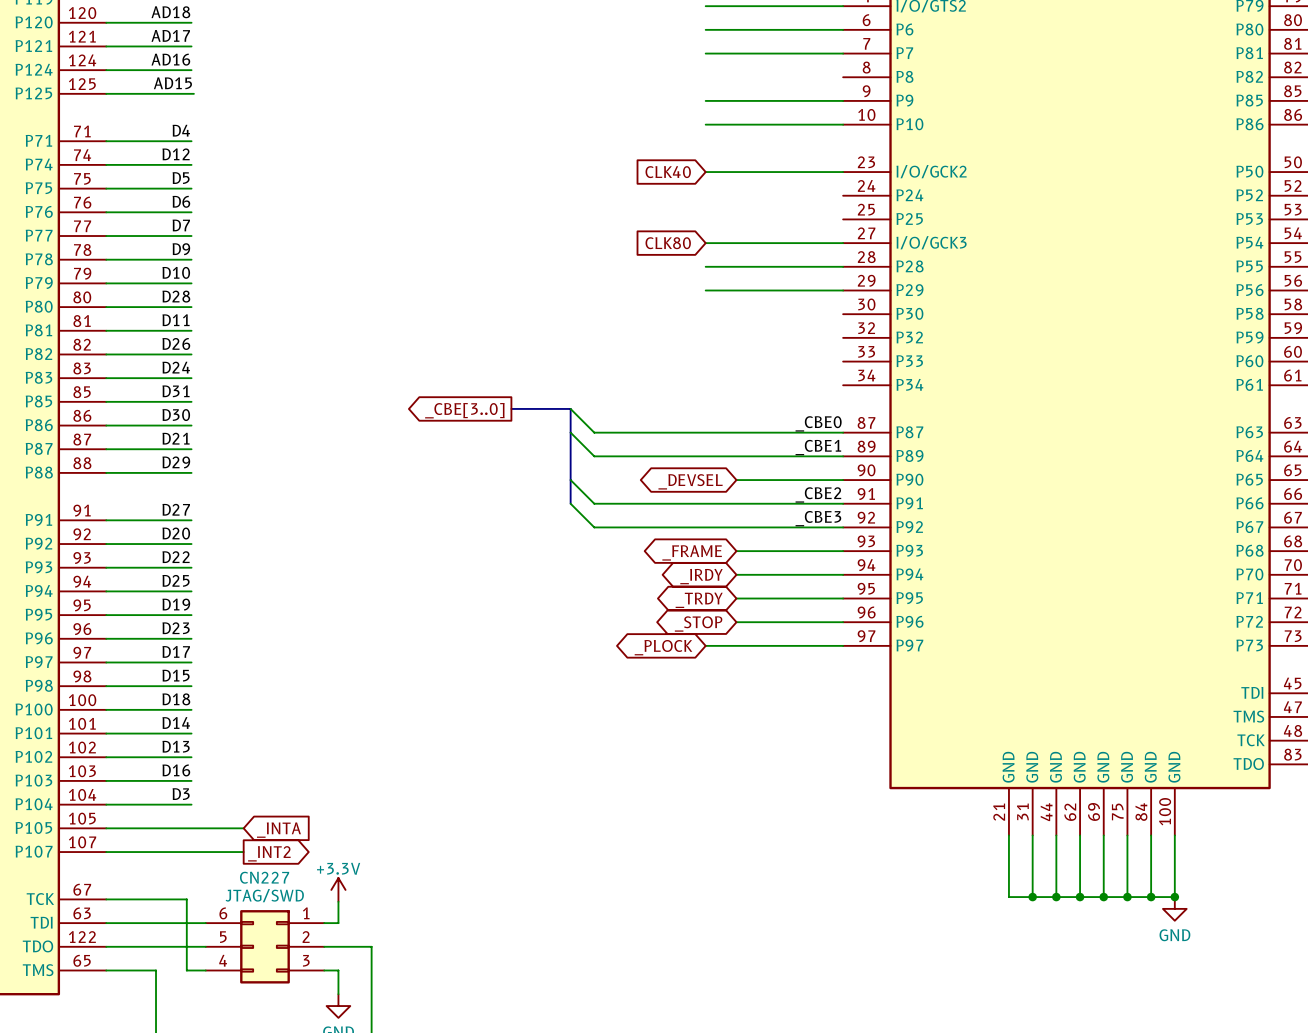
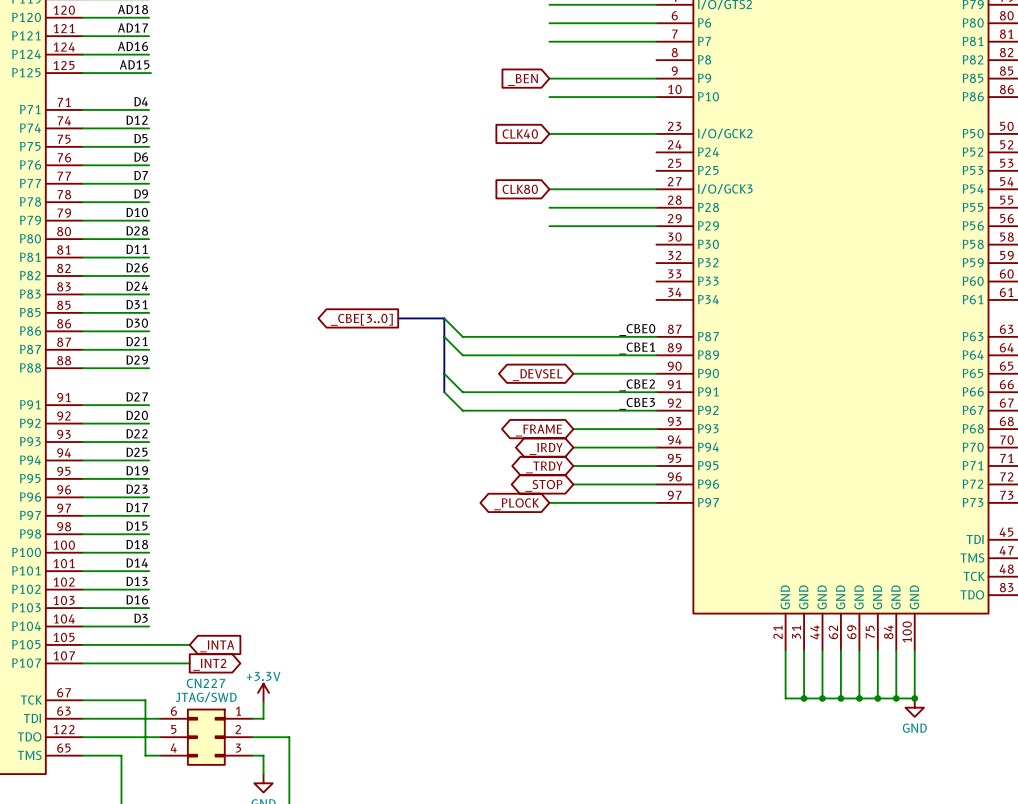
global label: none -> _BEN (522, 79)

